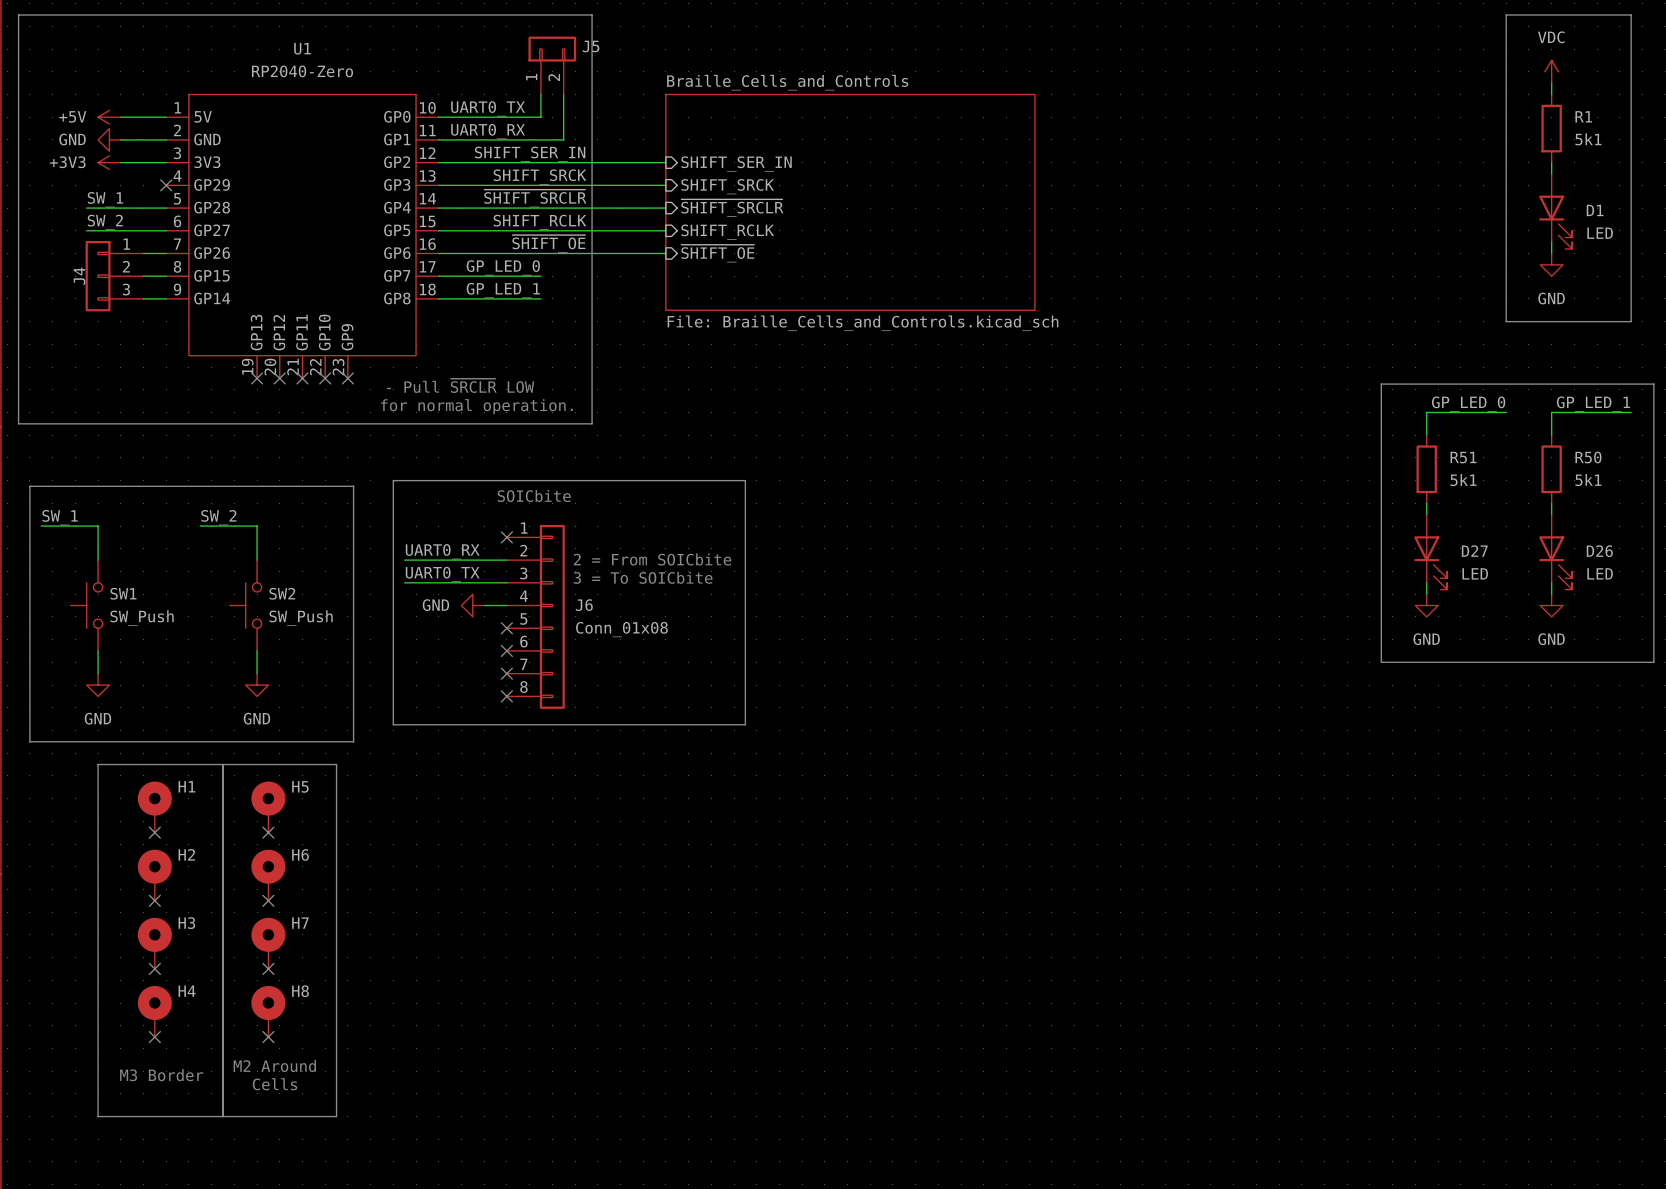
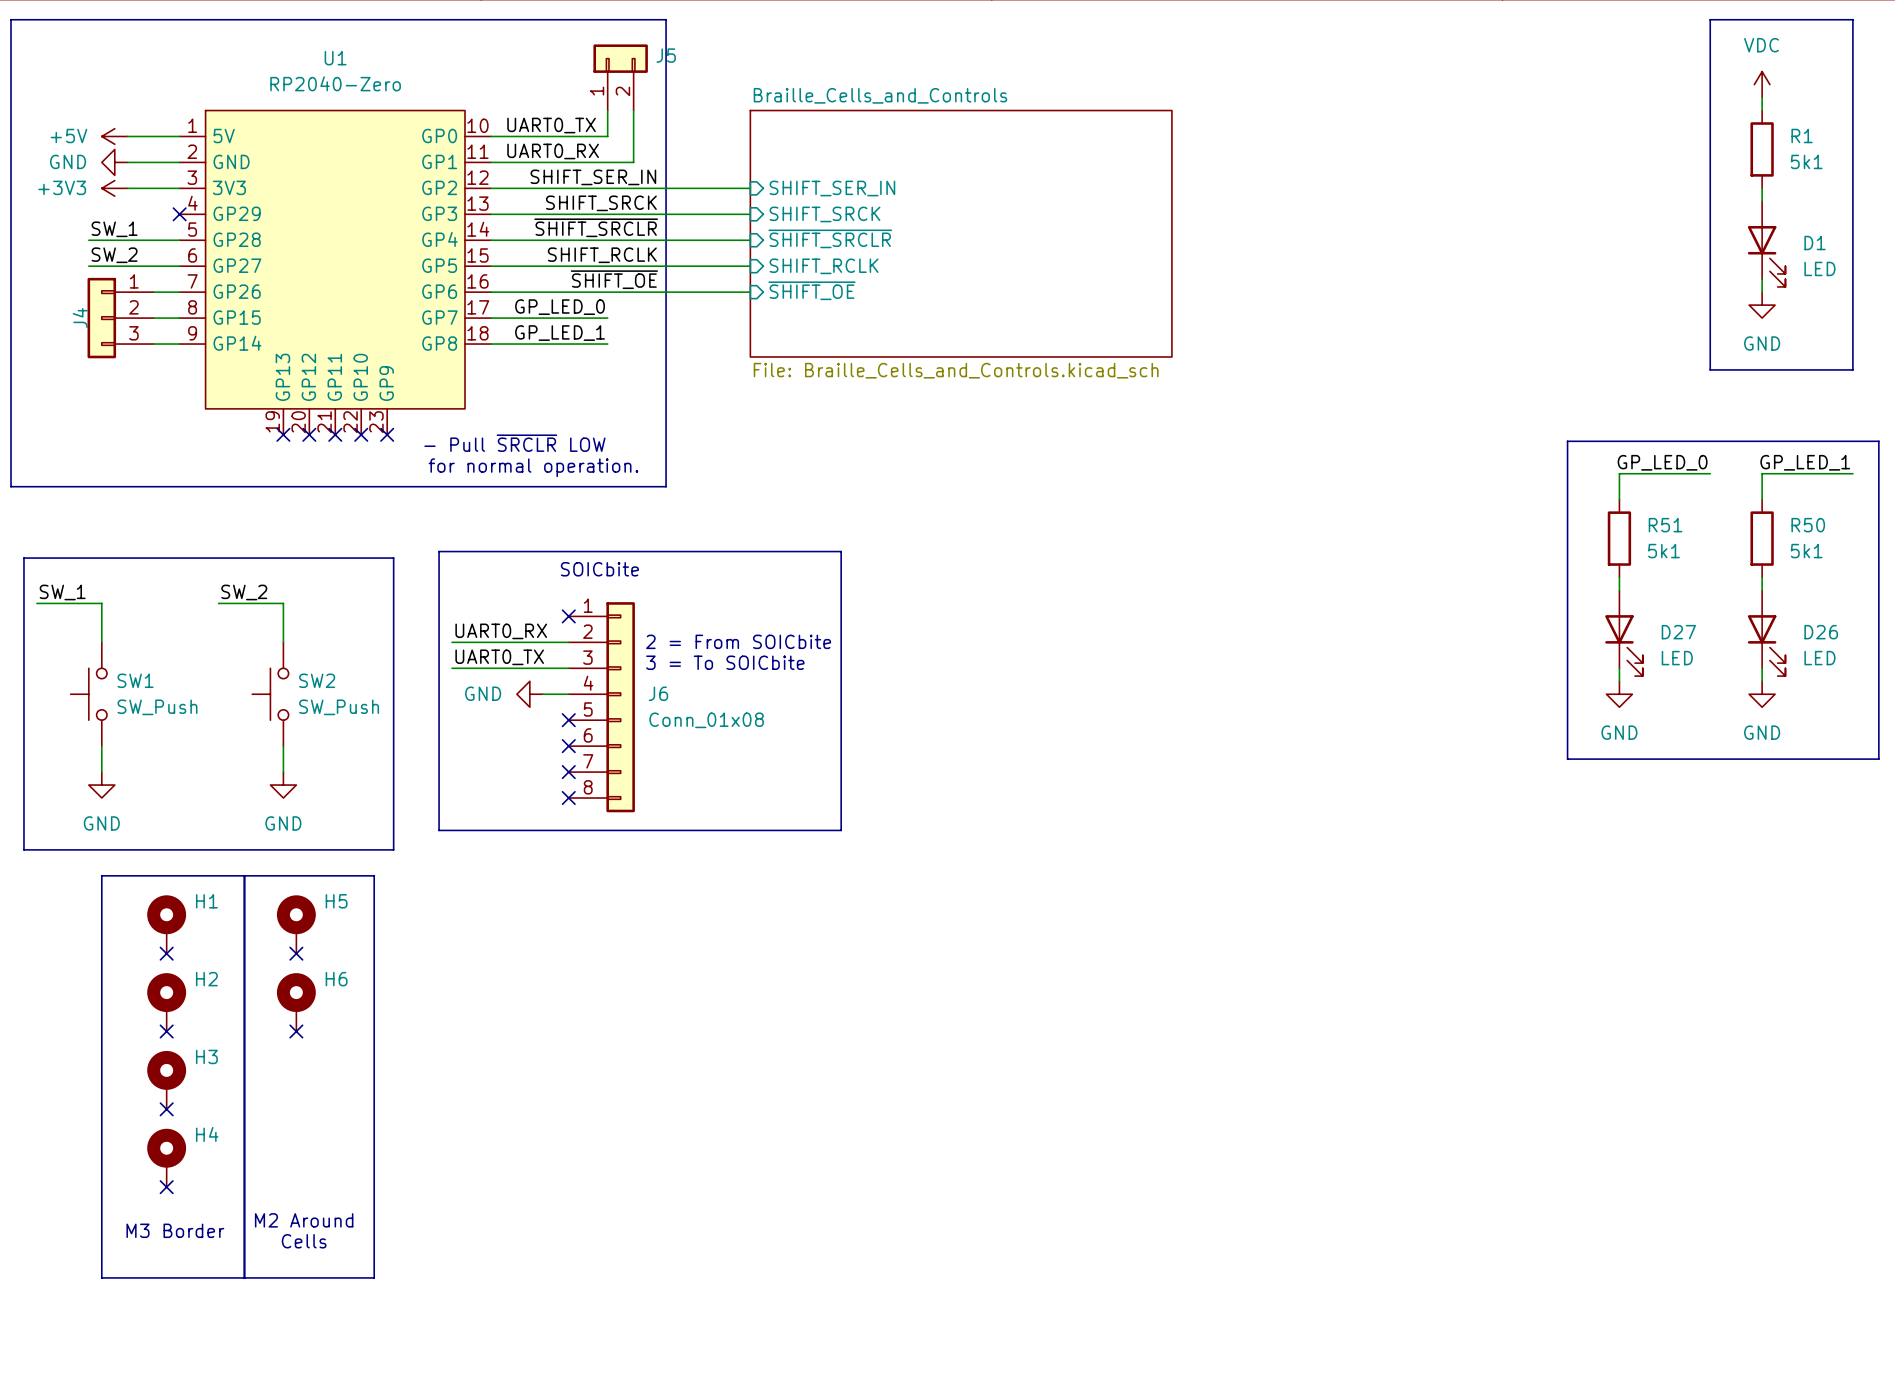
H7: (268, 943) -> none
no-connect mark: (268, 968) -> none
H8: (268, 1011) -> none
no-connect mark: (268, 1037) -> none

